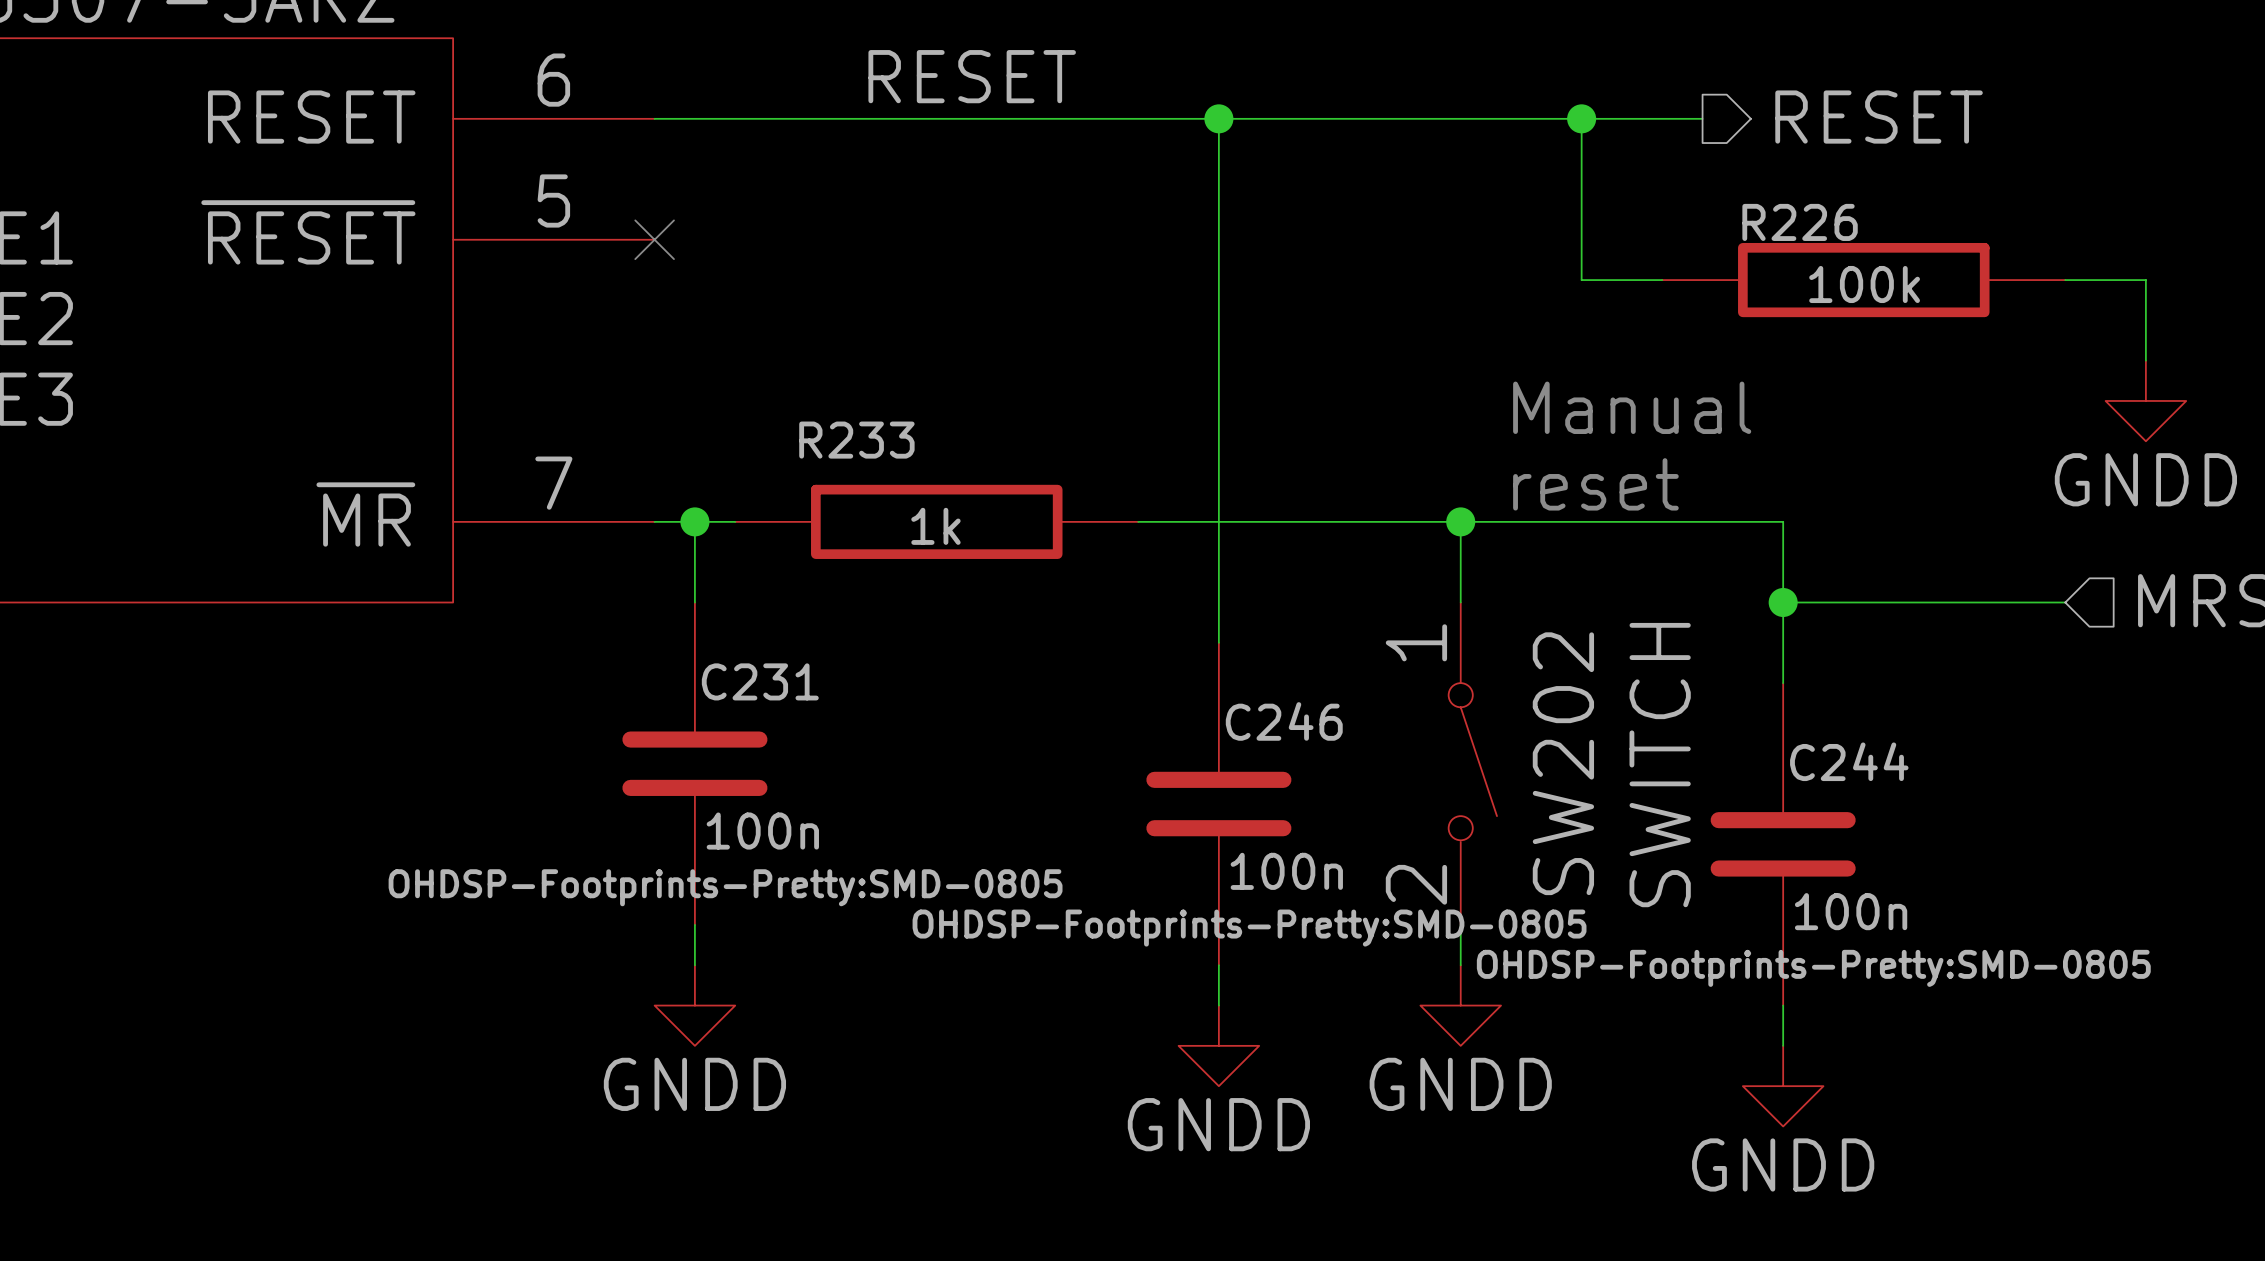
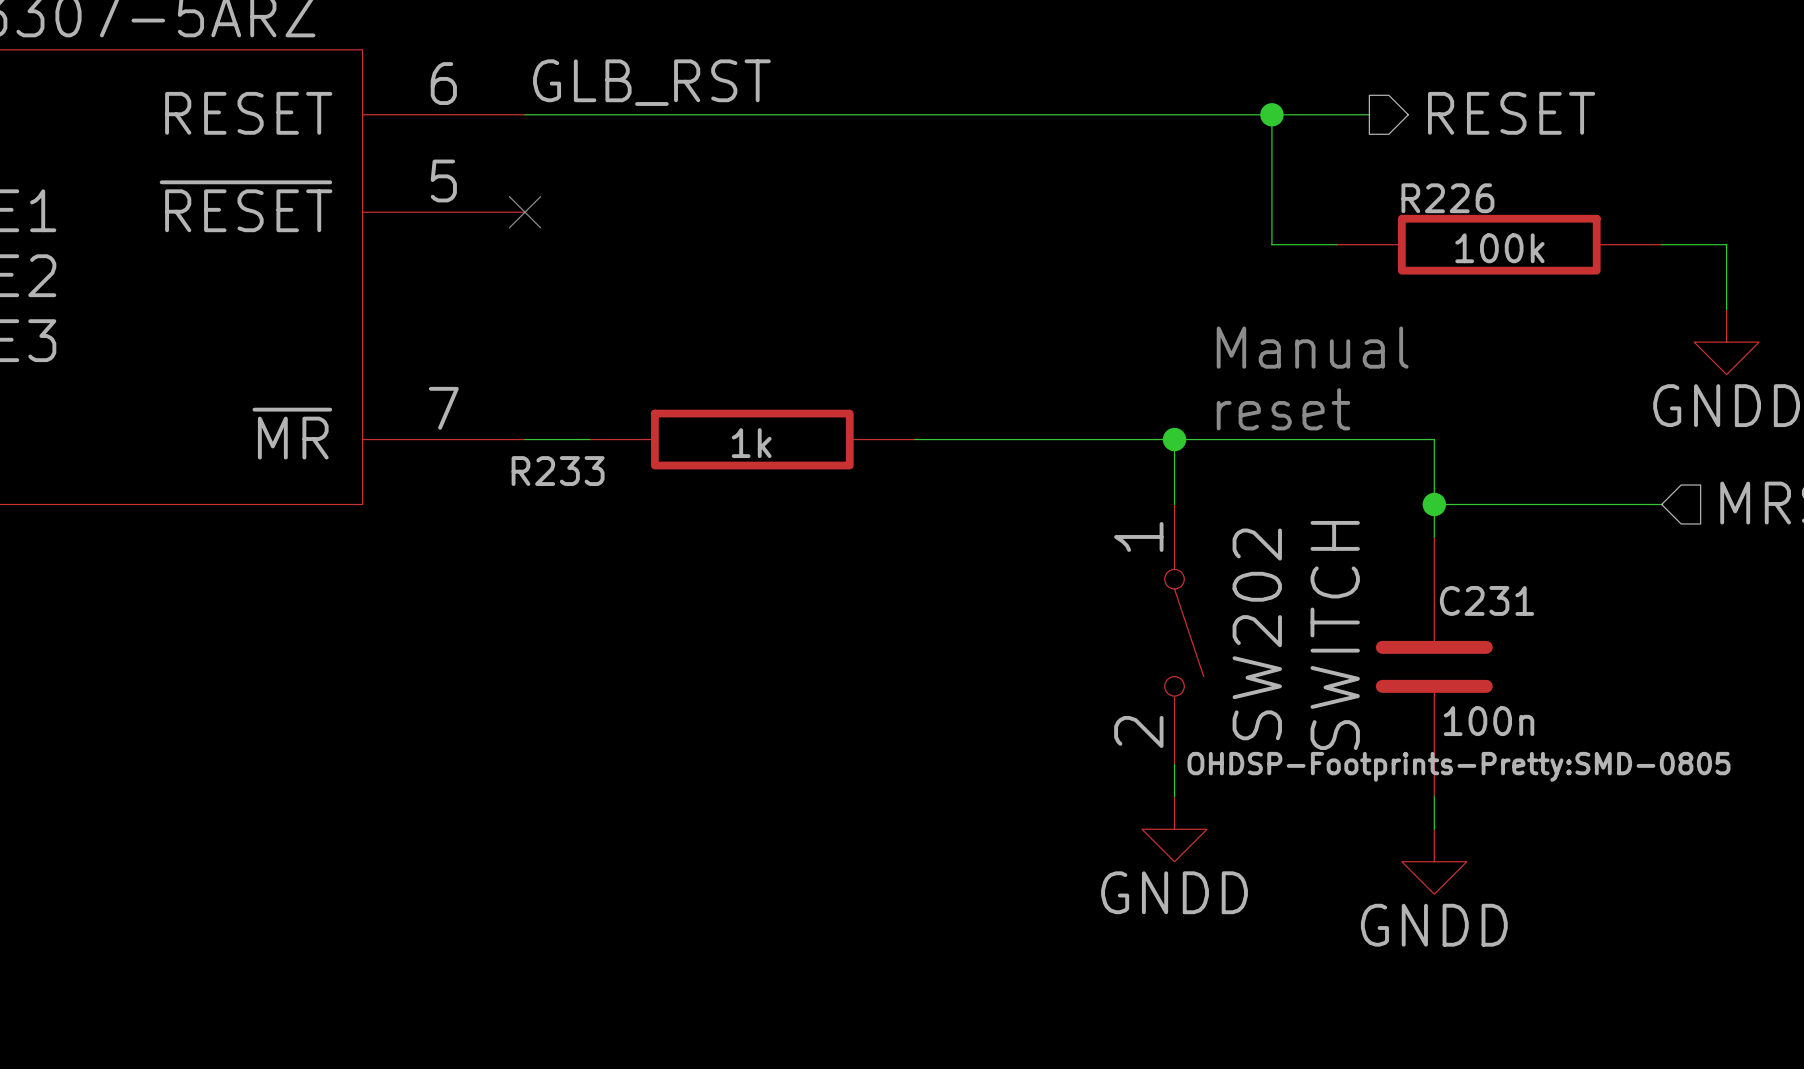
label: RESET (972, 76) -> none
label: none -> GLB_RST (651, 82)
wire: (1218, 118) (1218, 642) -> none
junction: (1218, 118) -> none
R233 name position: R233 (856, 440) -> R233 (558, 471)
wire: (694, 521) (694, 602) -> none
junction: (694, 521) -> none
C231 position: (694, 763) -> (1434, 666)
C246: 100n (1218, 804) -> none
C244: 100n (1783, 844) -> none
wire: (694, 924) (694, 965) -> none
wire: (1218, 965) (1218, 1005) -> none
power symbol: GNDD (694, 1005) -> none
power symbol: GNDD (1218, 1045) -> none
power symbol position: GNDD (1783, 1086) -> GNDD (1434, 861)

